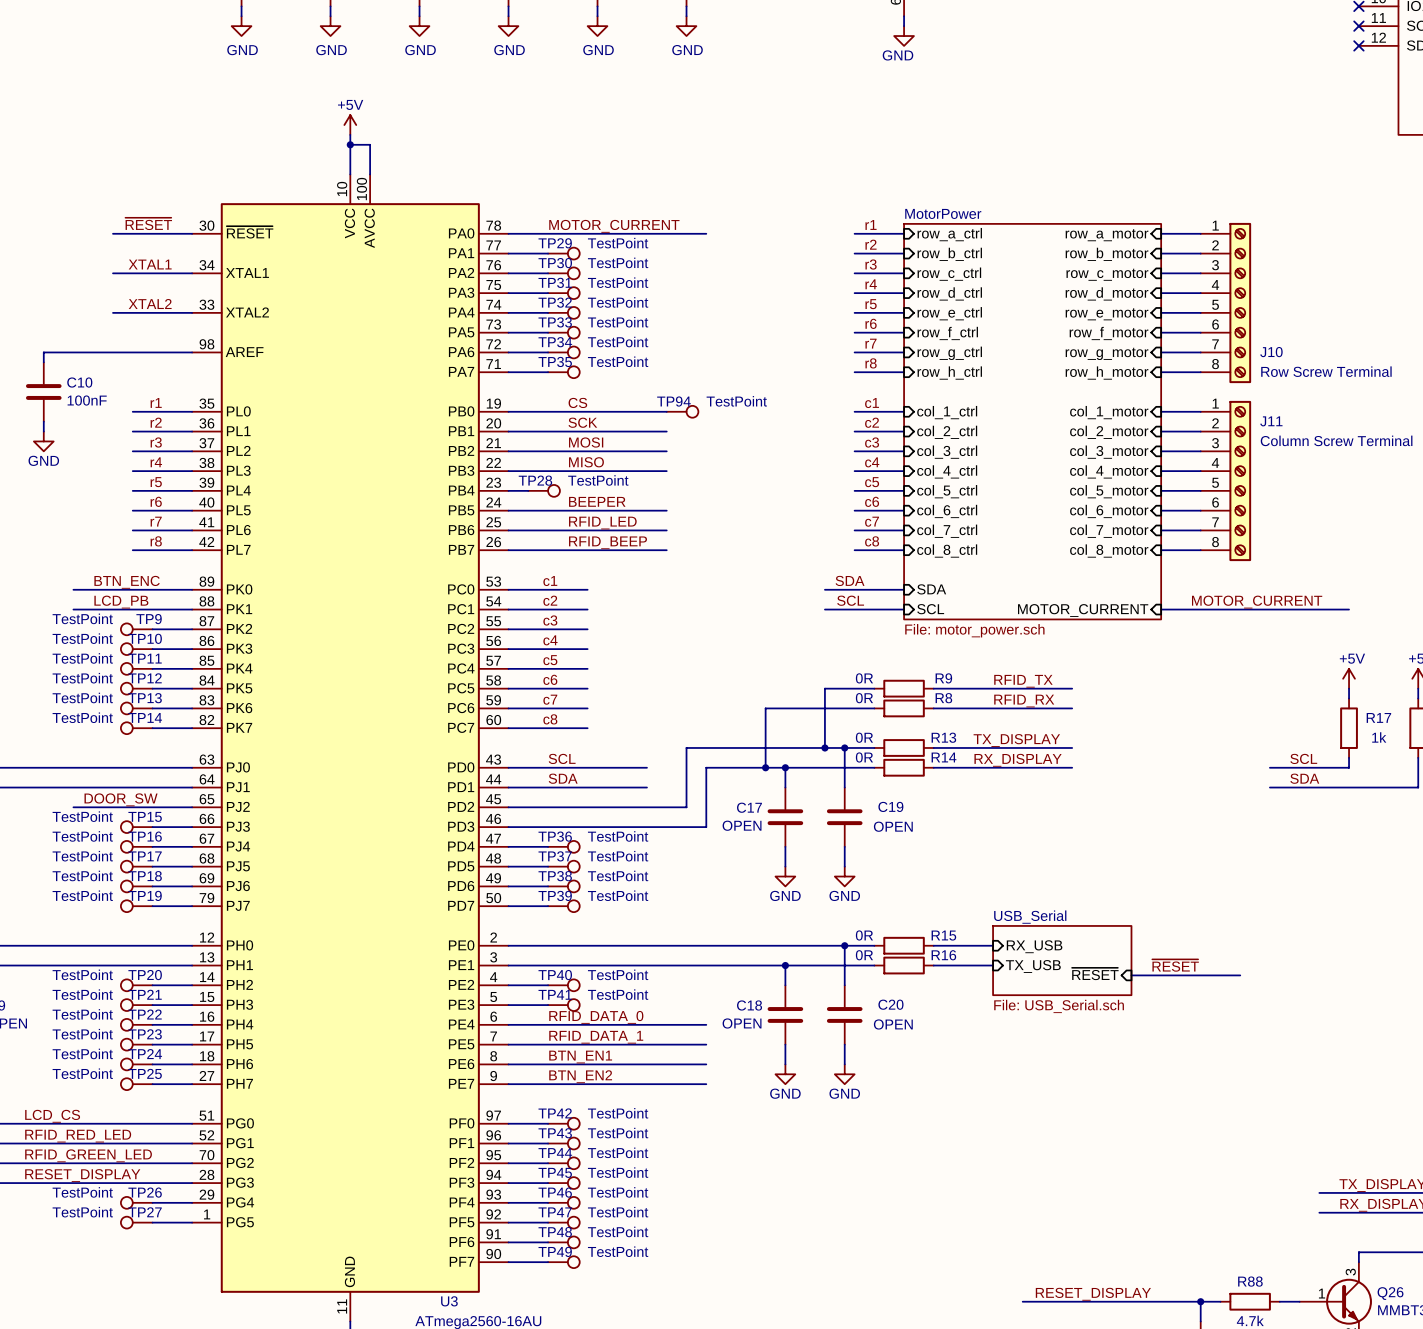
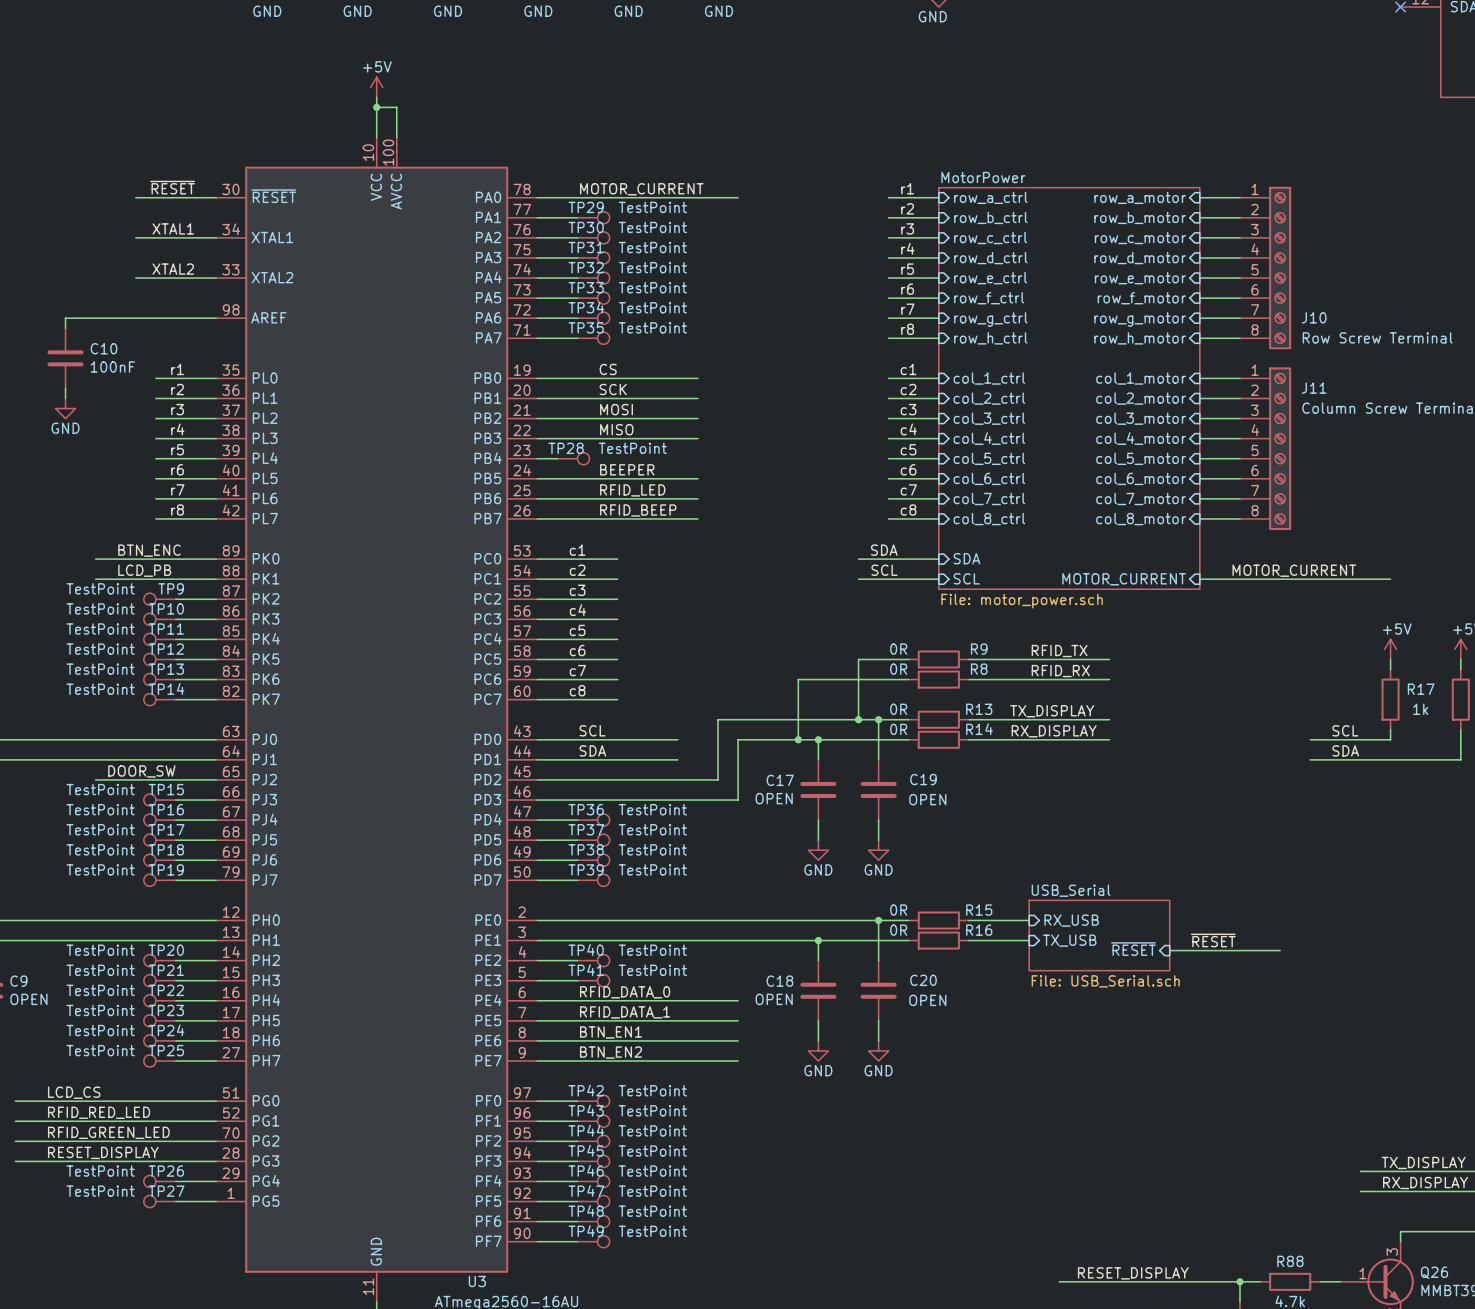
TP94: TestPoint (682, 411) -> none

